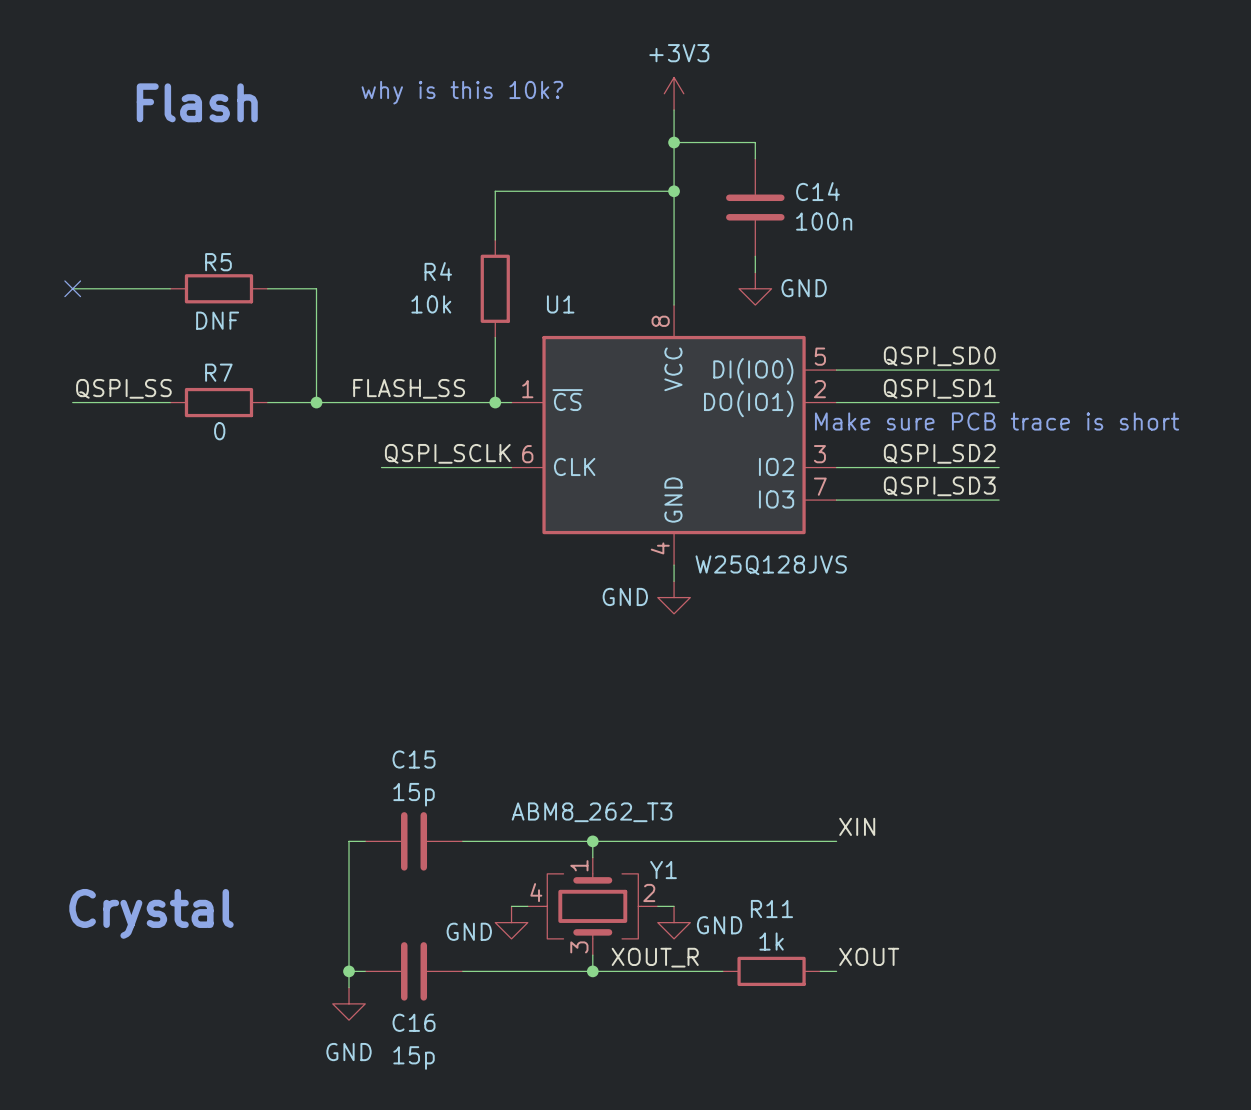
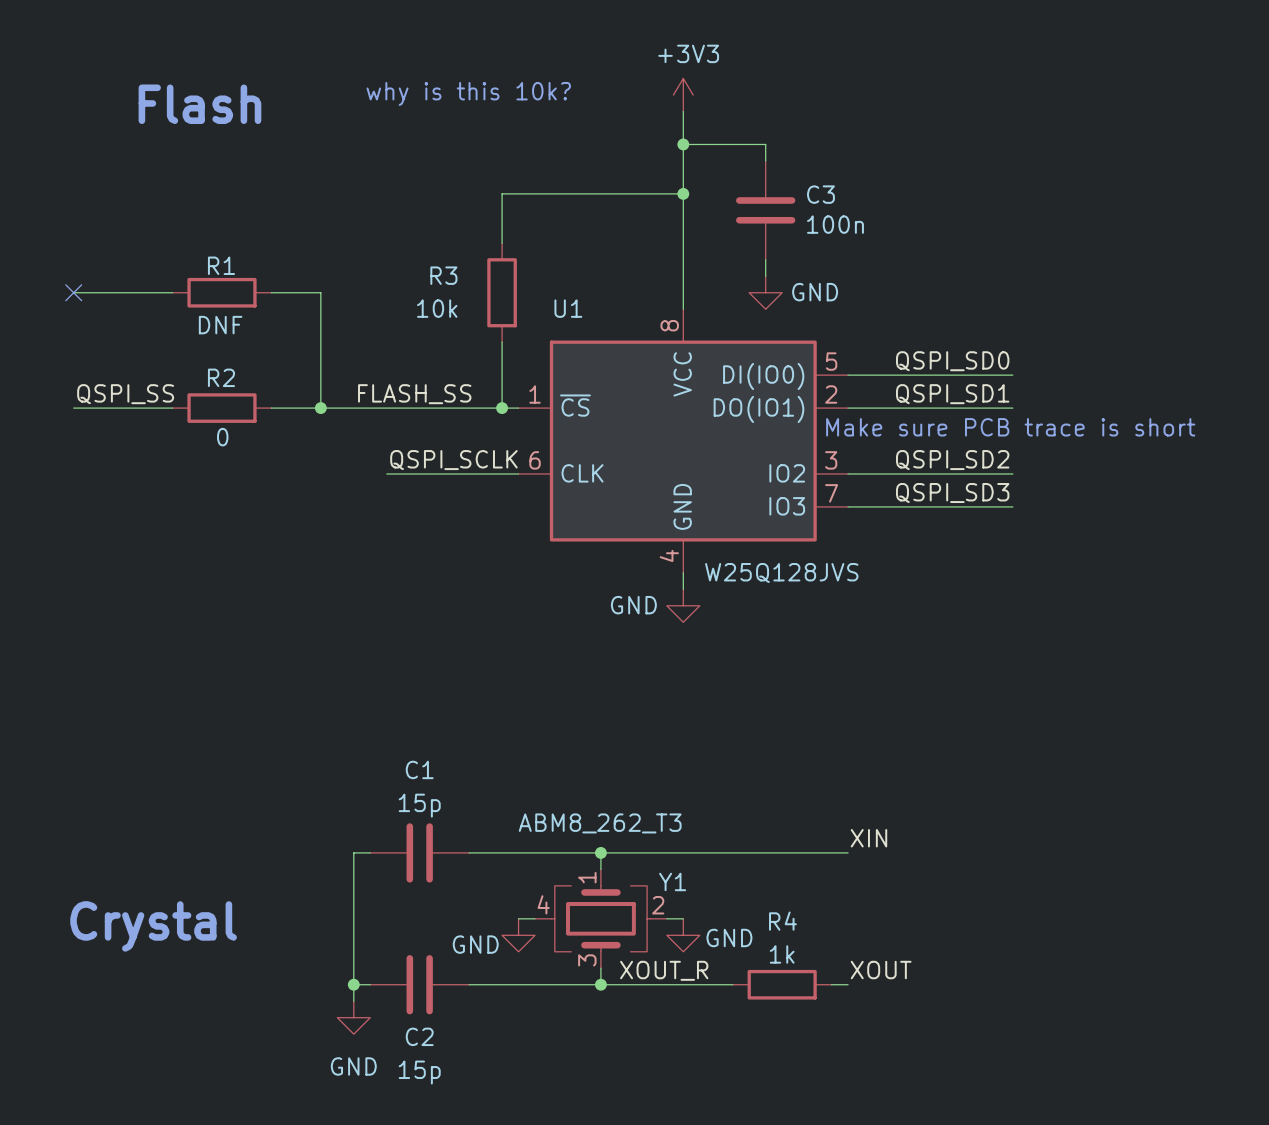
C14 name: C14 (817, 191) -> C3 (820, 194)
R5 name: R5 (218, 262) -> R1 (221, 265)
R4 name: R4 (438, 271) -> R3 (443, 275)
R7 name: R7 (218, 372) -> R2 (221, 377)
C15 name: C15 (414, 759) -> C1 (419, 769)
R11 name: R11 (771, 909) -> R4 (782, 921)
C16 name: C16 (414, 1022) -> C2 (419, 1036)

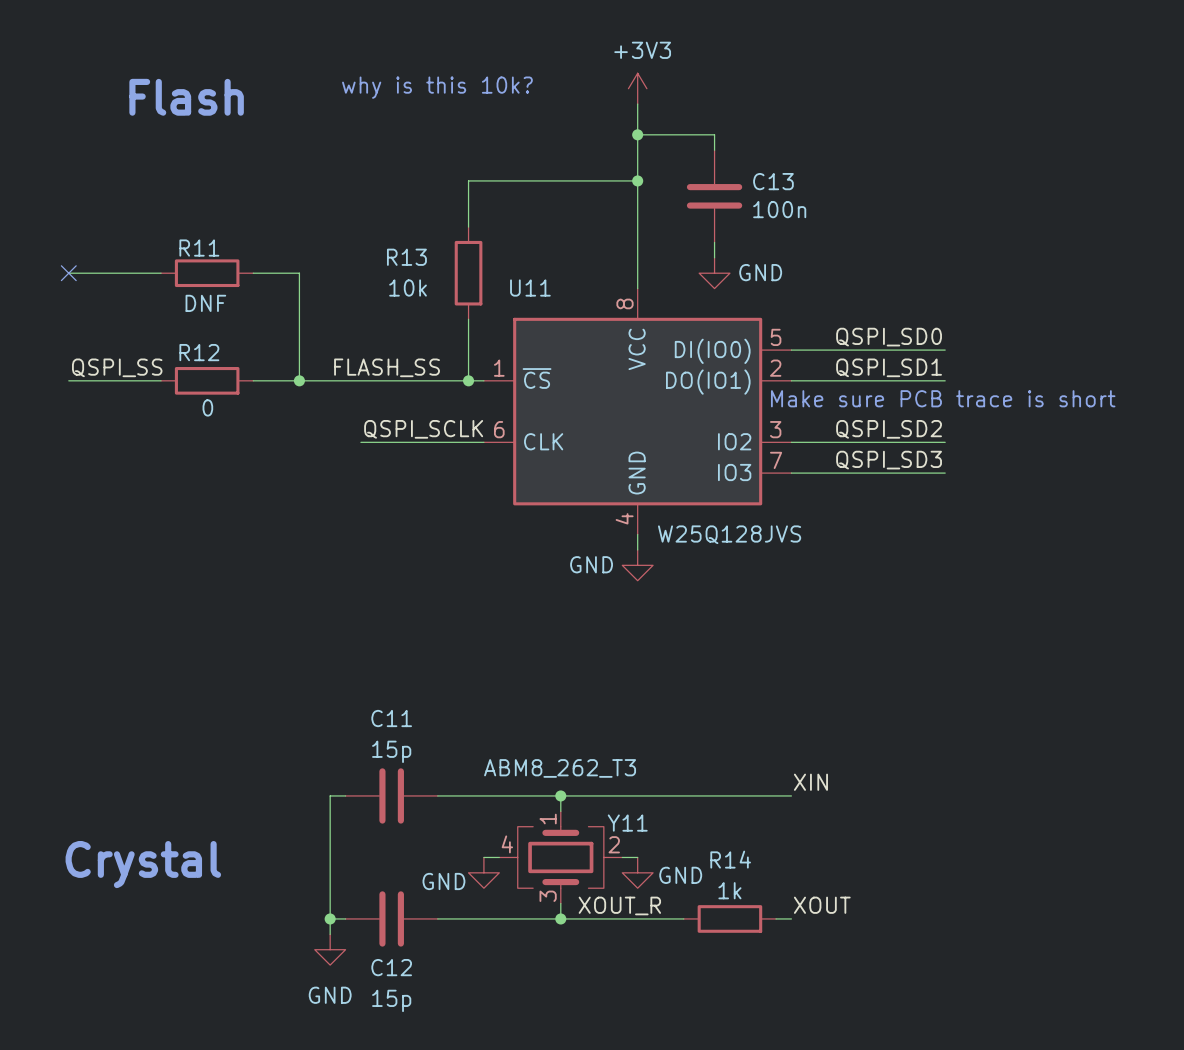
C3 name: C3 (820, 194) -> C13 (773, 181)
R1 name: R1 (221, 265) -> R11 (199, 248)
R3 name: R3 (443, 275) -> R13 (406, 257)
U1 name: U1 (568, 308) -> U11 (530, 288)
R2 name: R2 (221, 377) -> R12 (199, 352)
C1 name: C1 (419, 769) -> C11 (391, 718)
Y1 name: Y1 (672, 881) -> Y11 (627, 823)
R4 name: R4 (782, 921) -> R14 (730, 859)
C2 name: C2 (419, 1036) -> C12 (391, 967)

